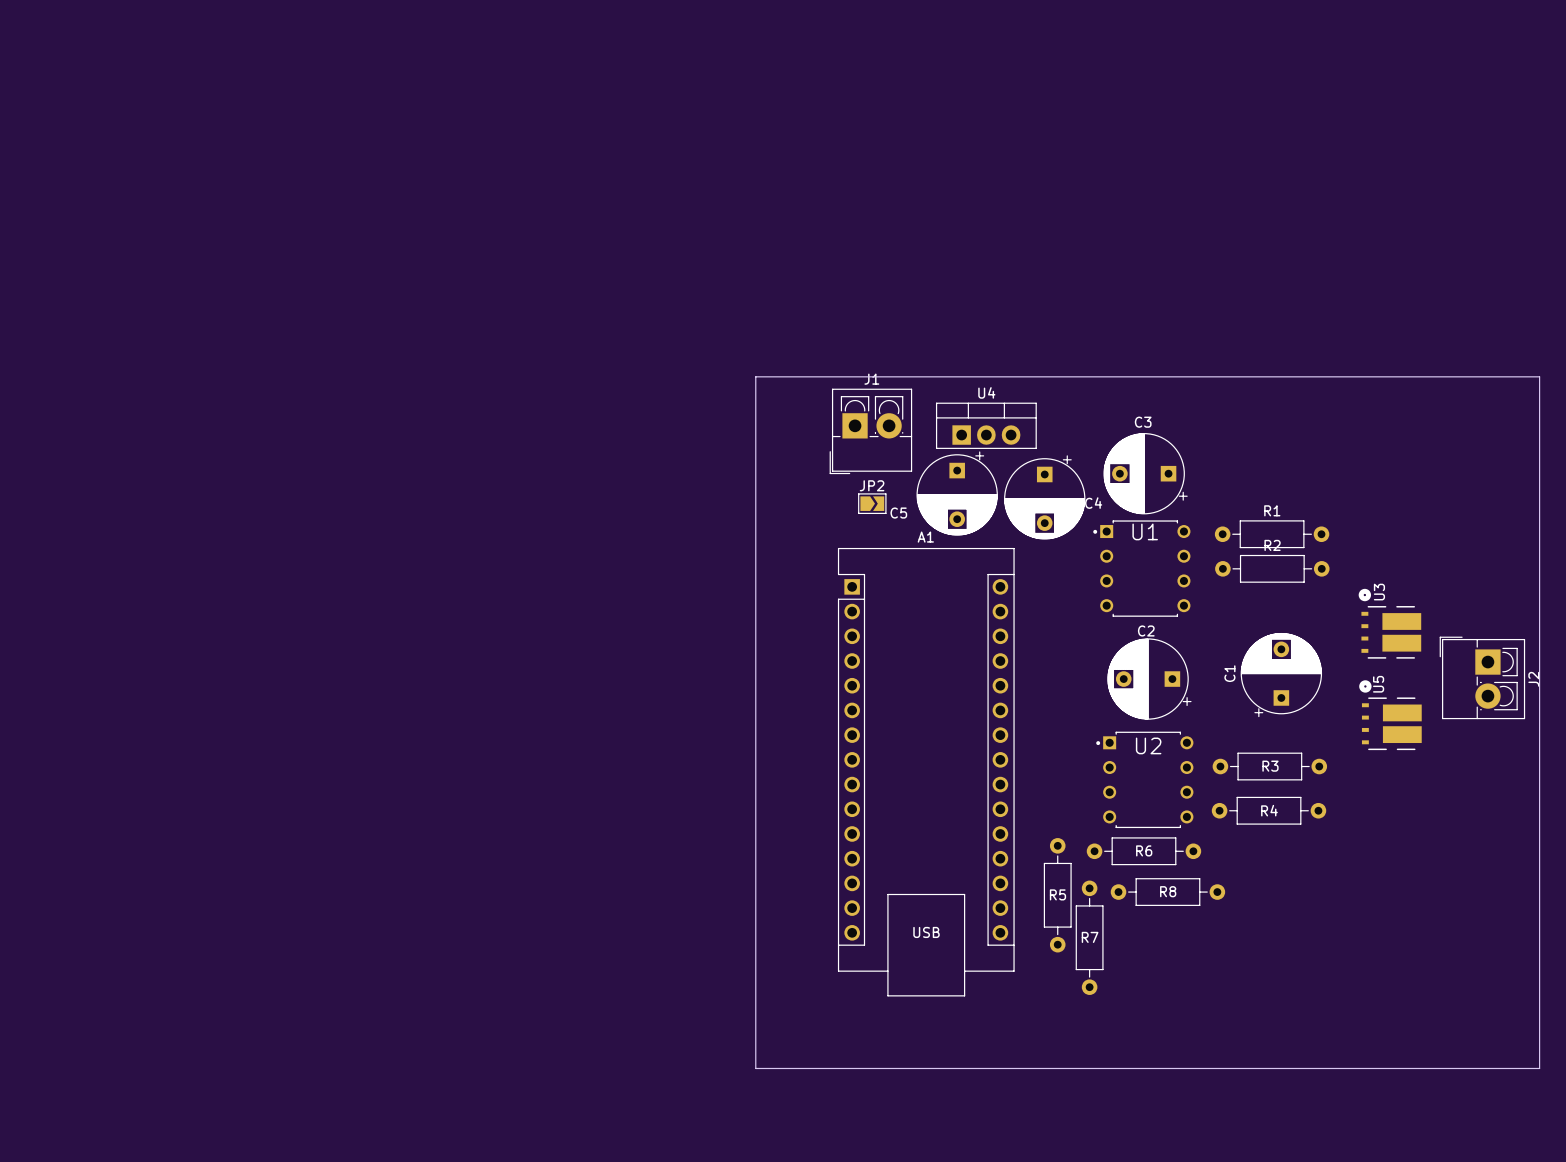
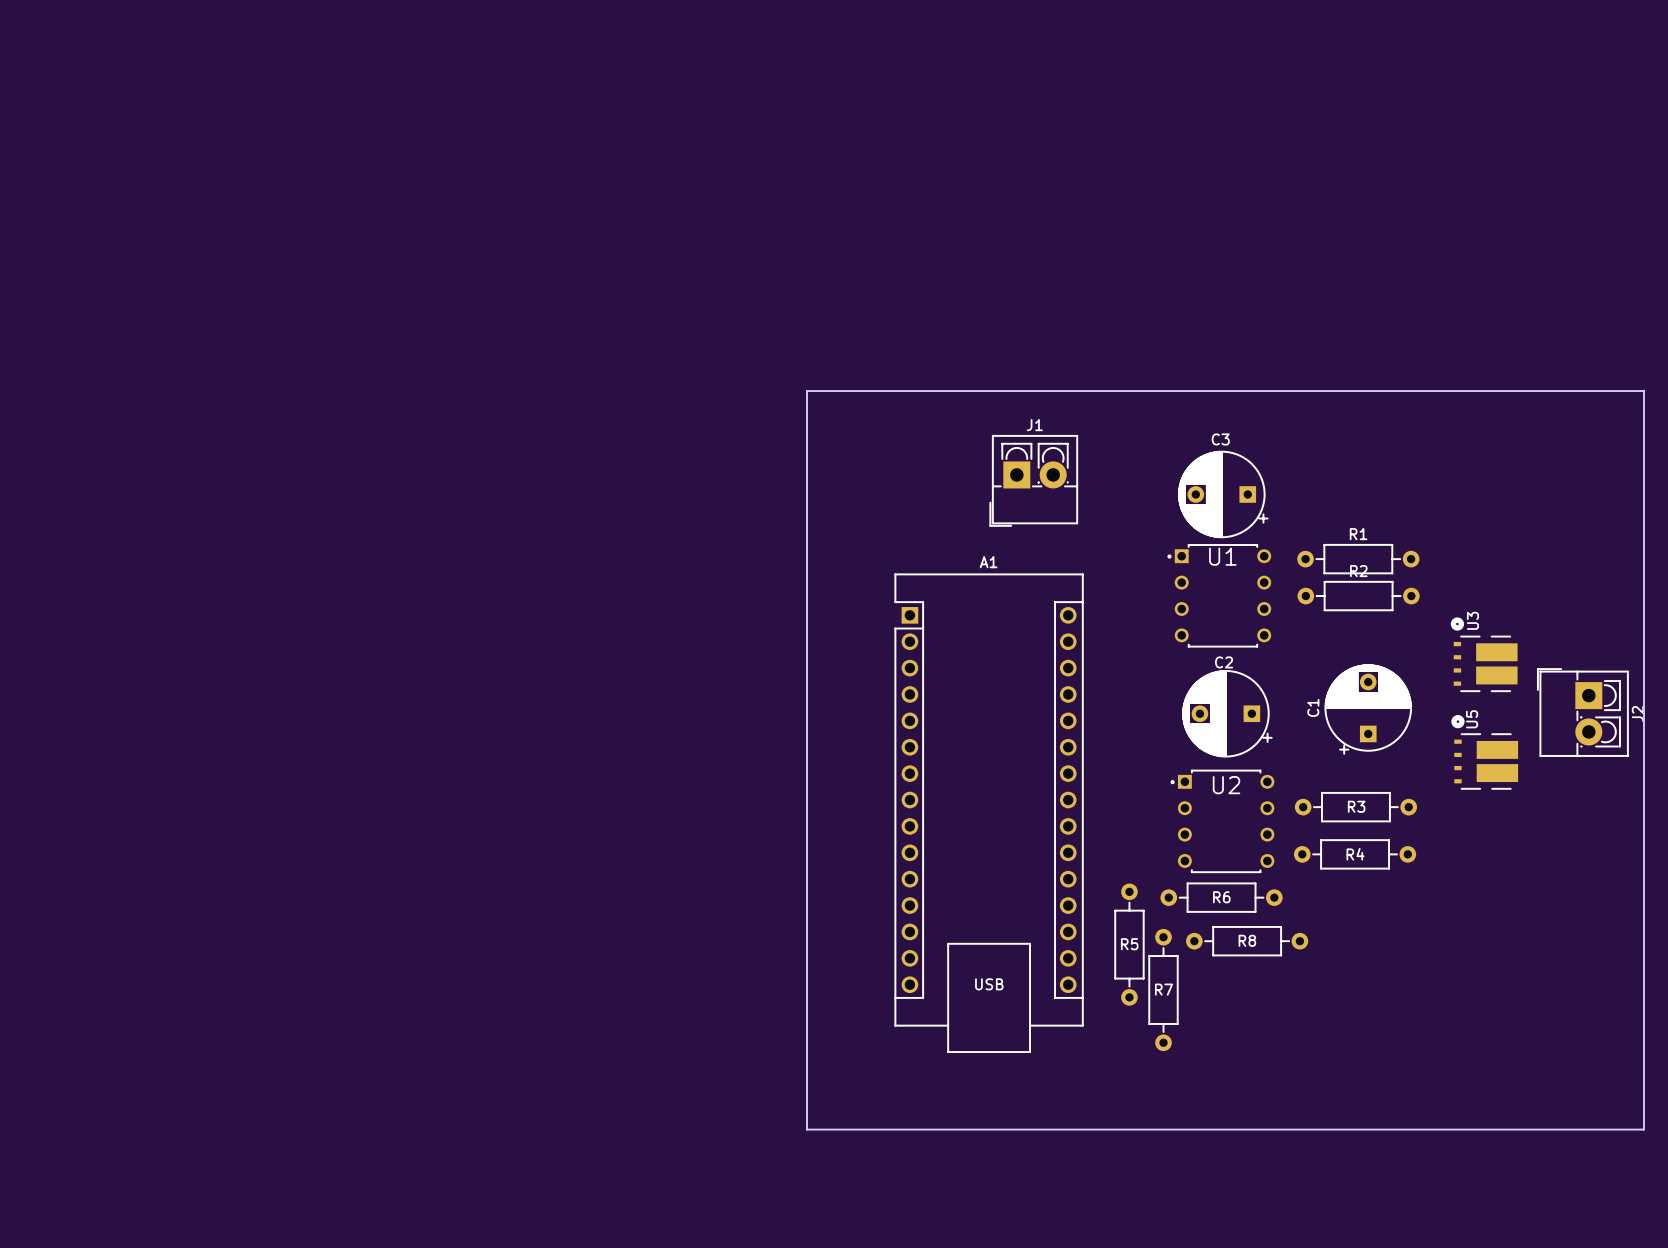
U4: (986, 425) -> none
J1 position: (870, 431) -> (1033, 480)
C5: (957, 493) -> none
C4: (1044, 497) -> none
JP2: (872, 503) -> none

